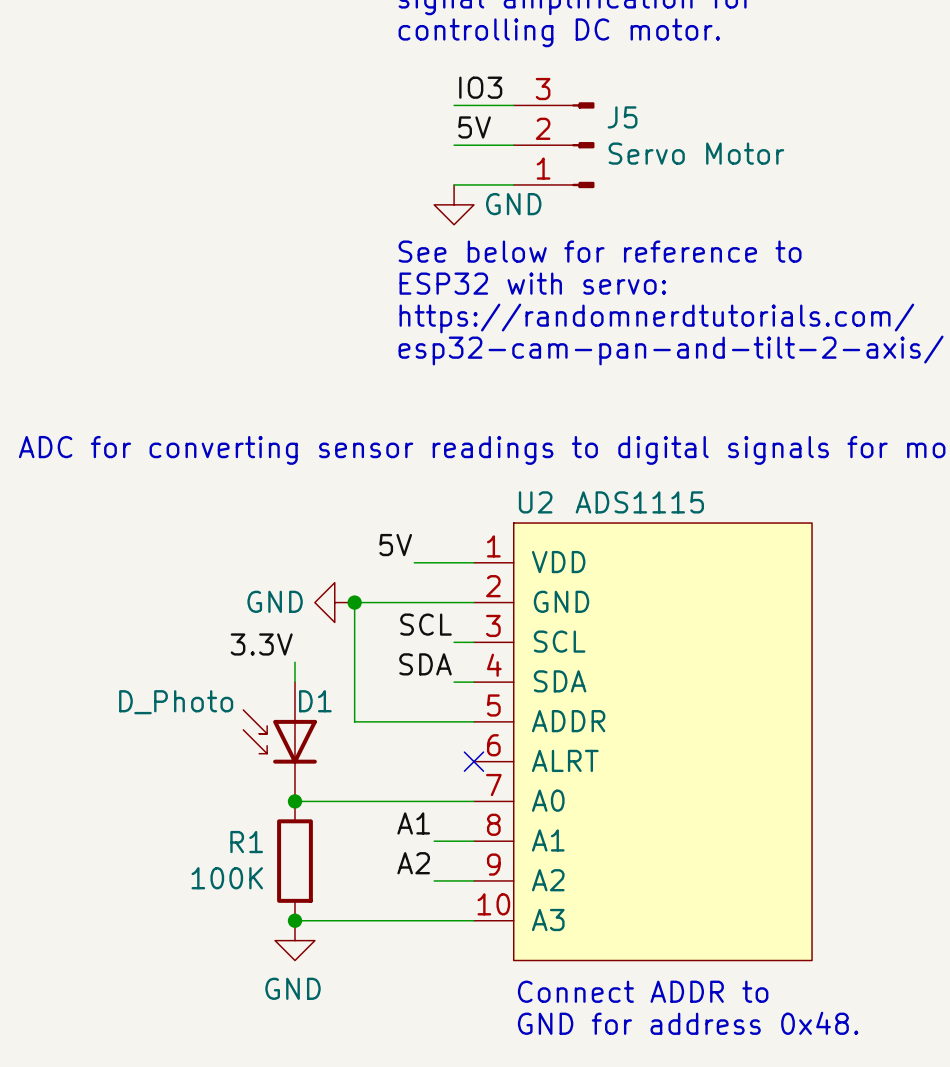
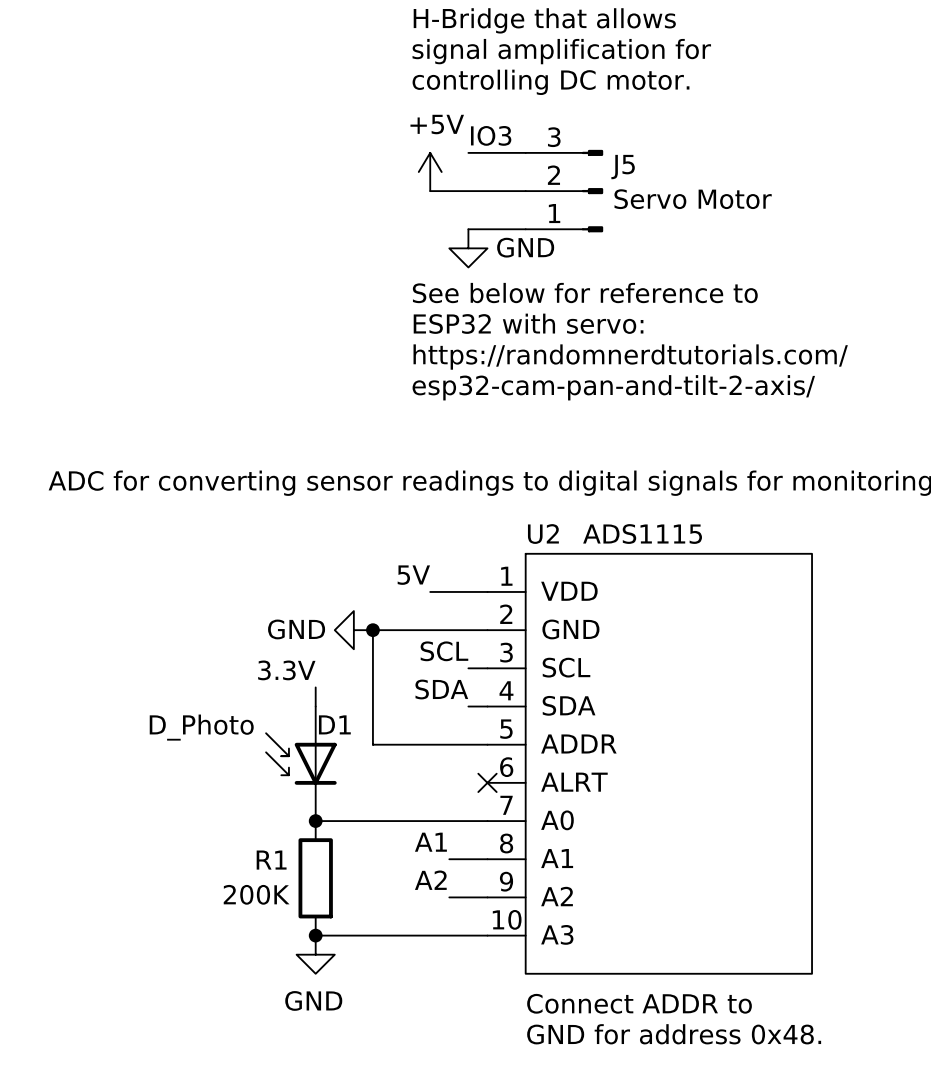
power symbol: none -> +5V (430, 172)
label: 5V (474, 127) -> none
wire: none -> (430, 191) (468, 191)
R1 value: 100K (227, 878) -> 200K (256, 894)

